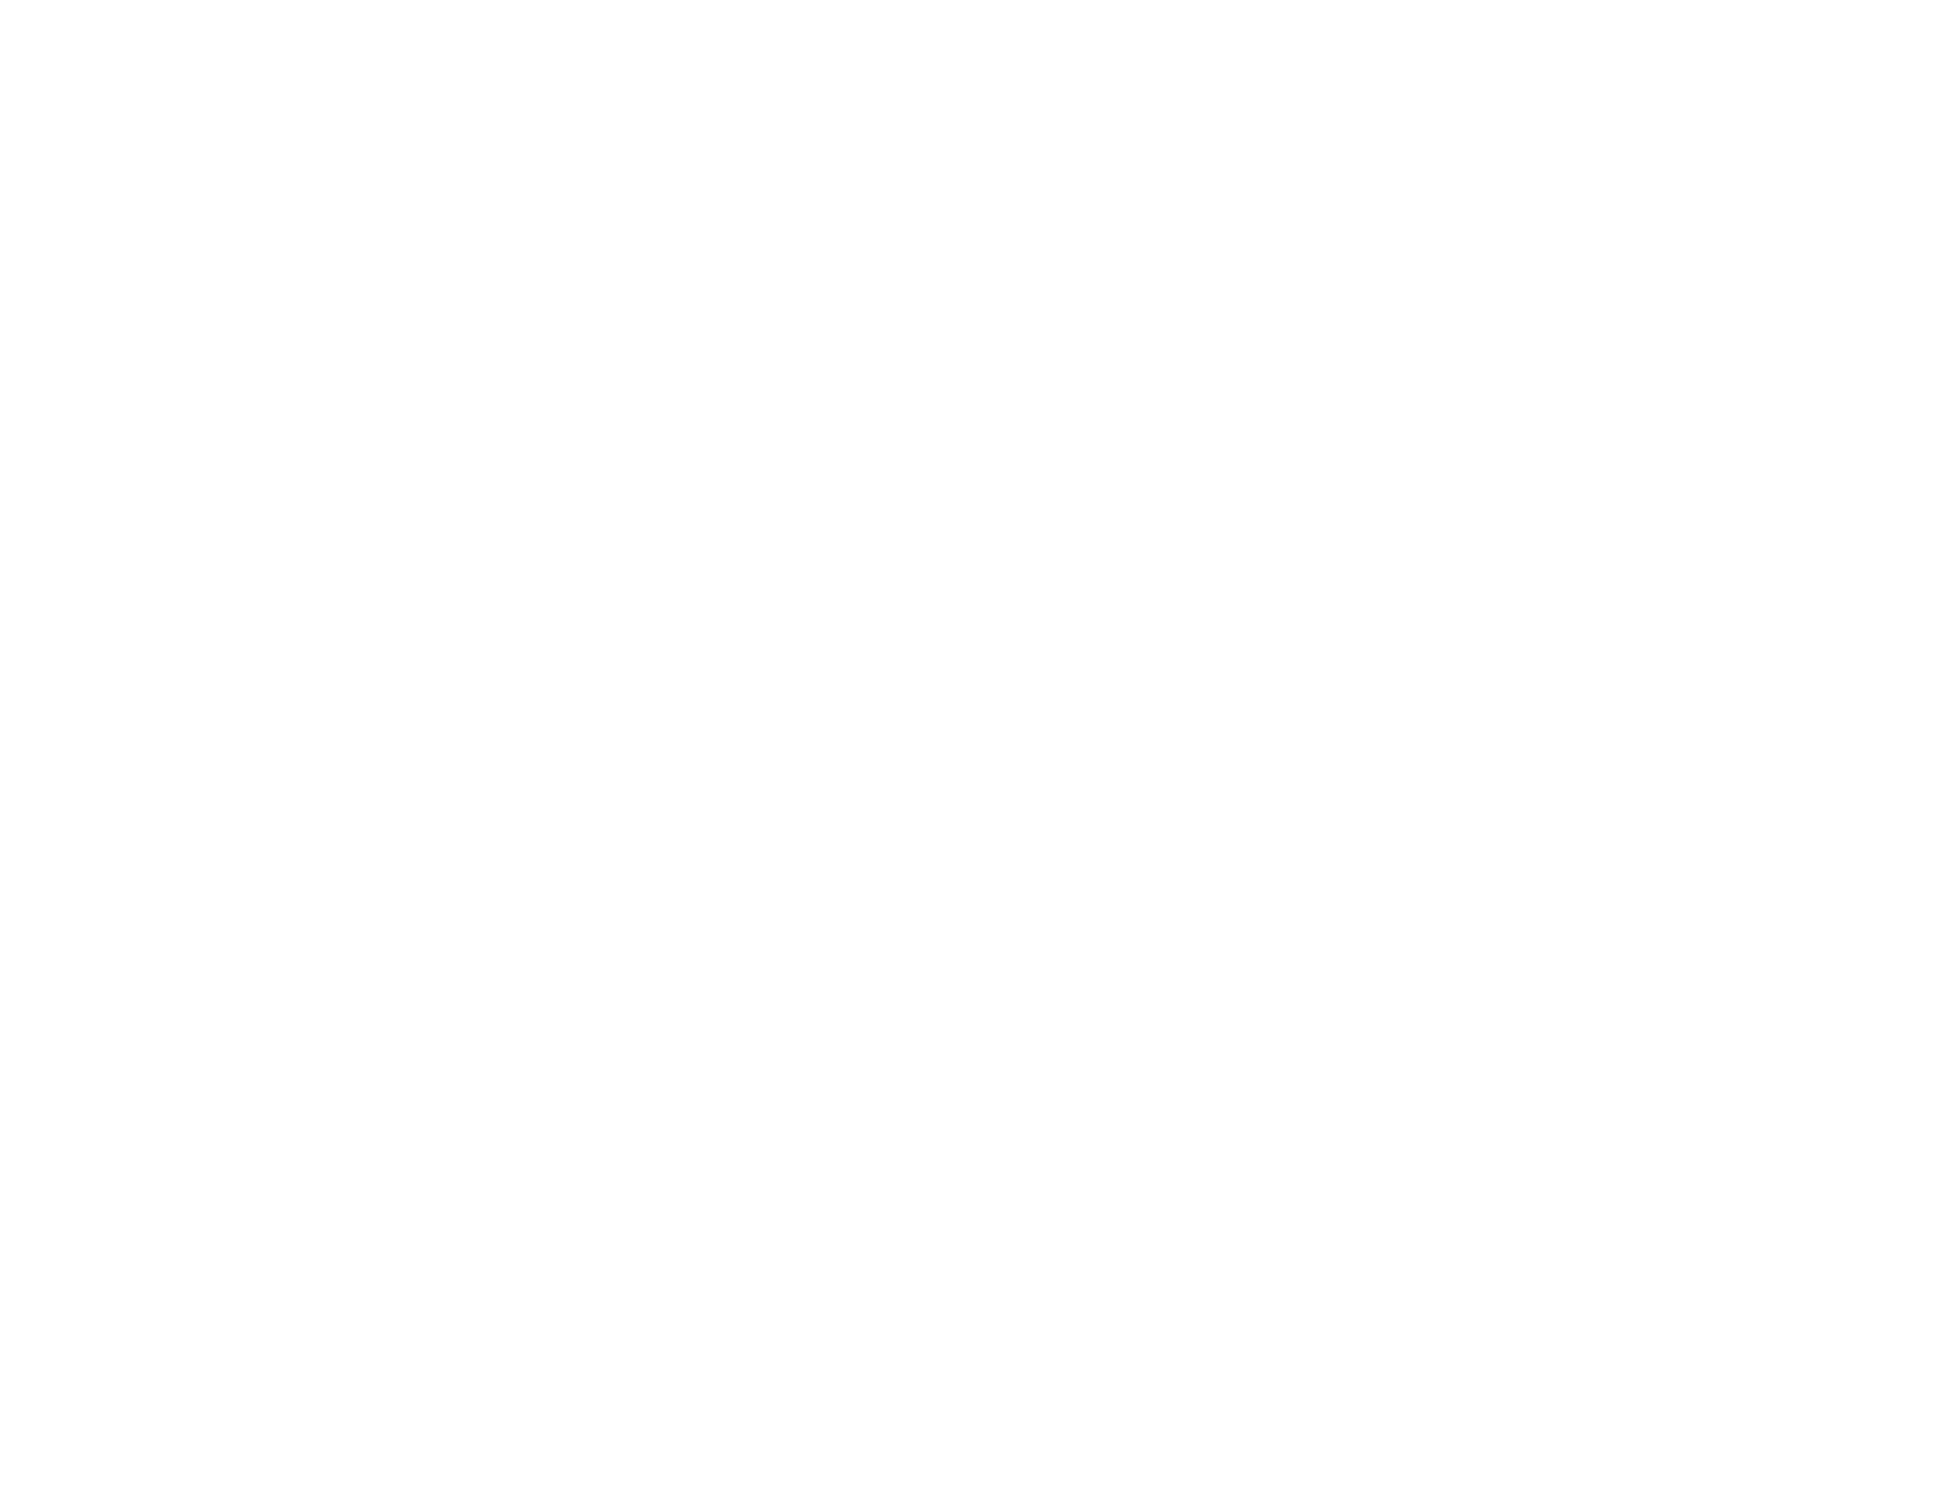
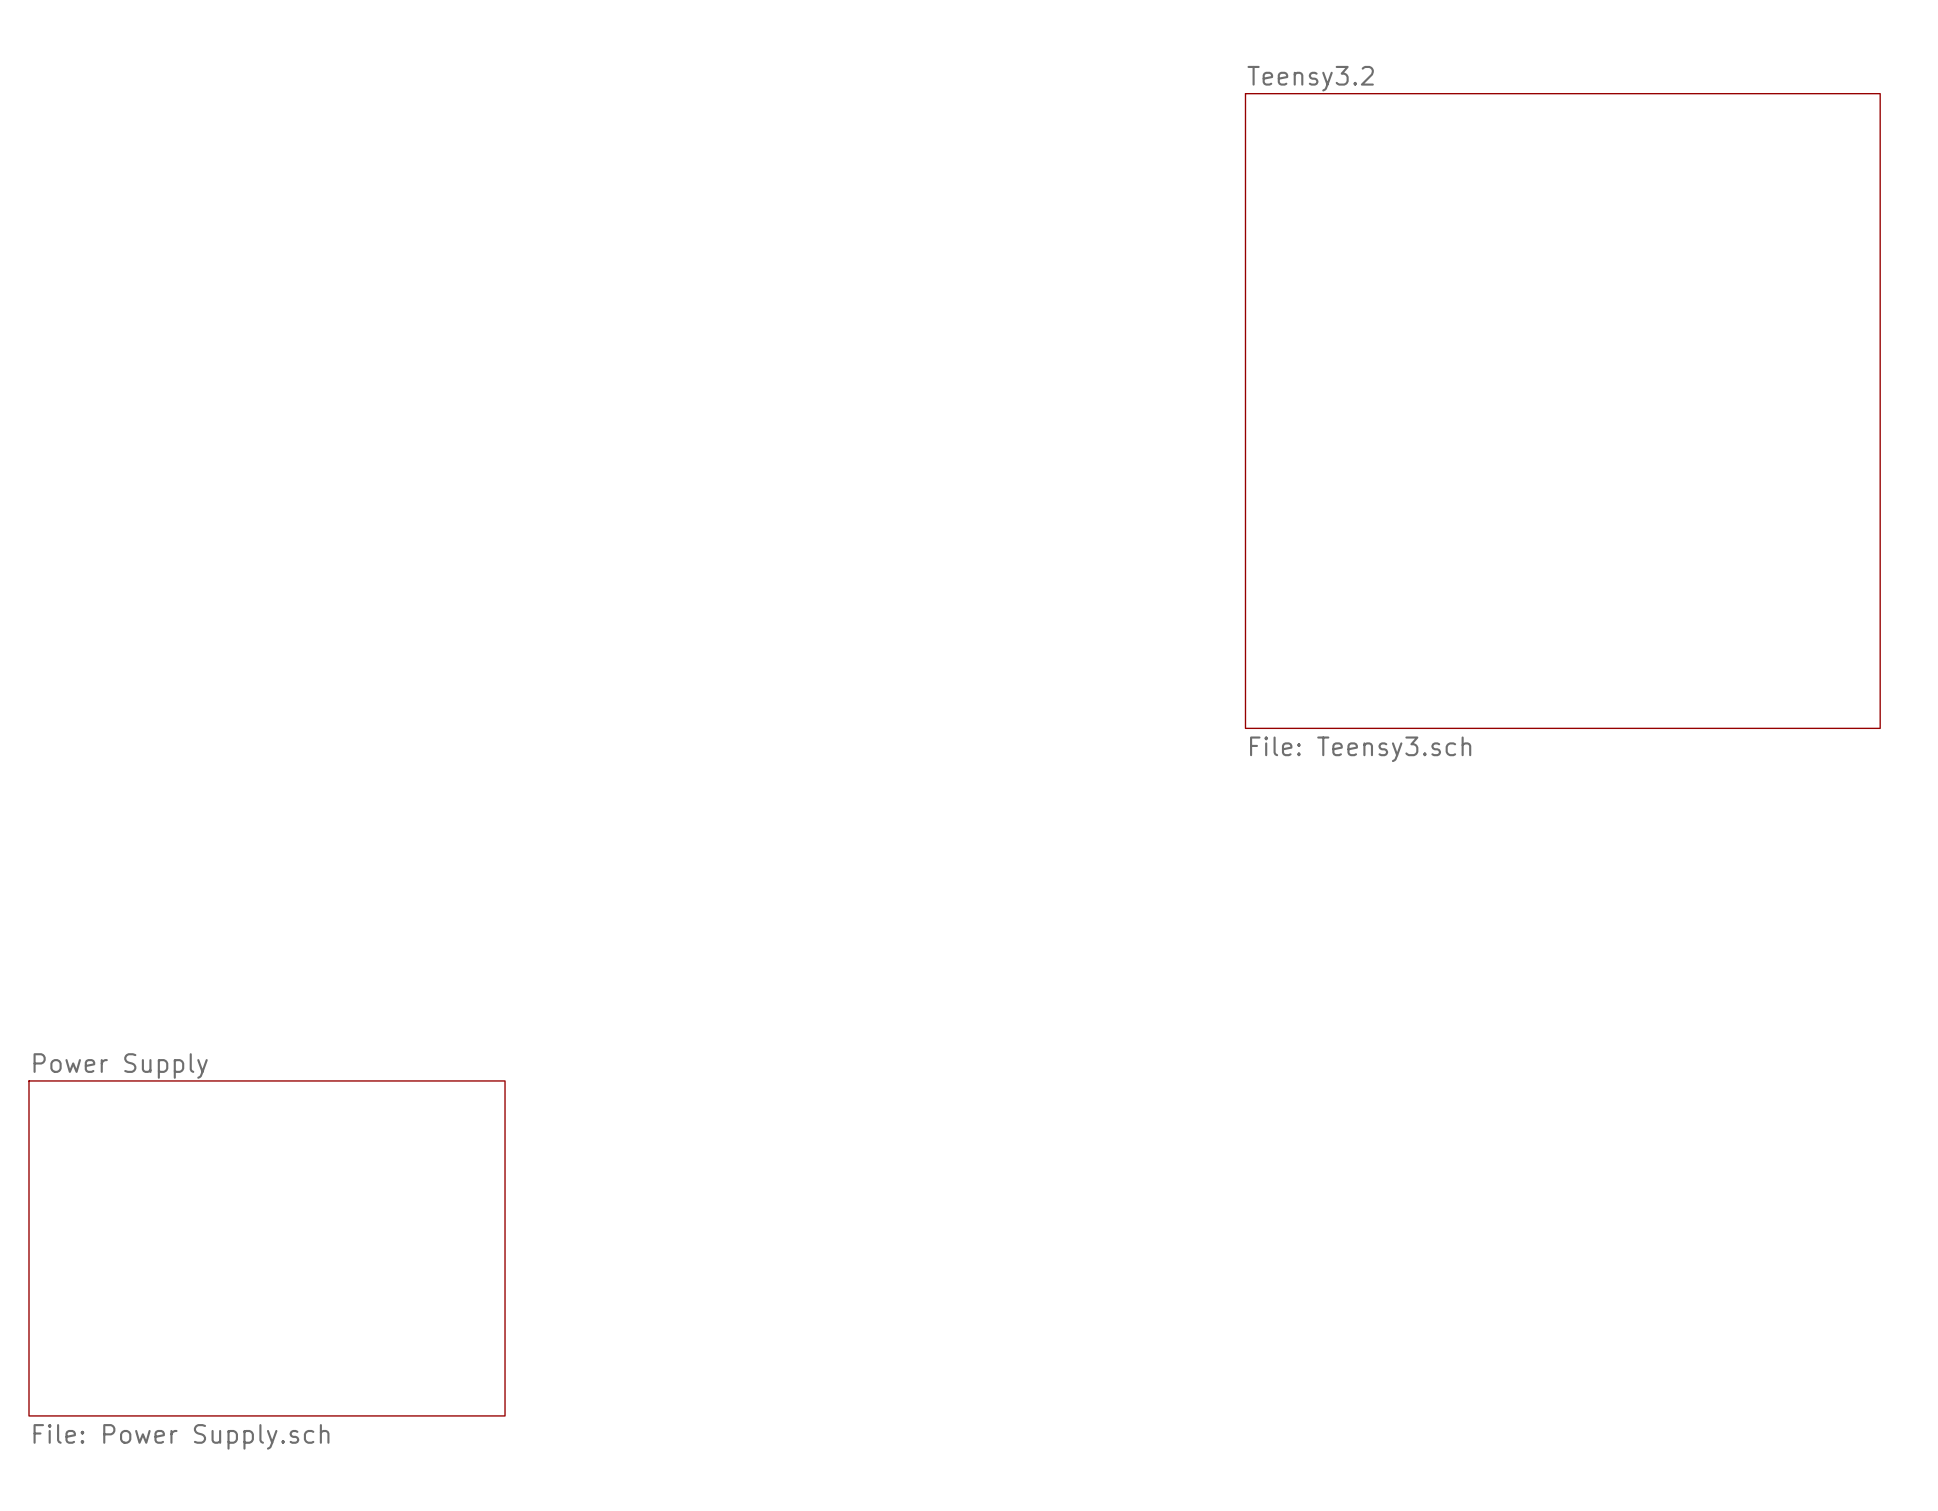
sheet Teensy3.2: none -> File: Teensy3.sch (1562, 411)
sheet Power Supply: none -> File: Power Supply.sch (267, 1248)

